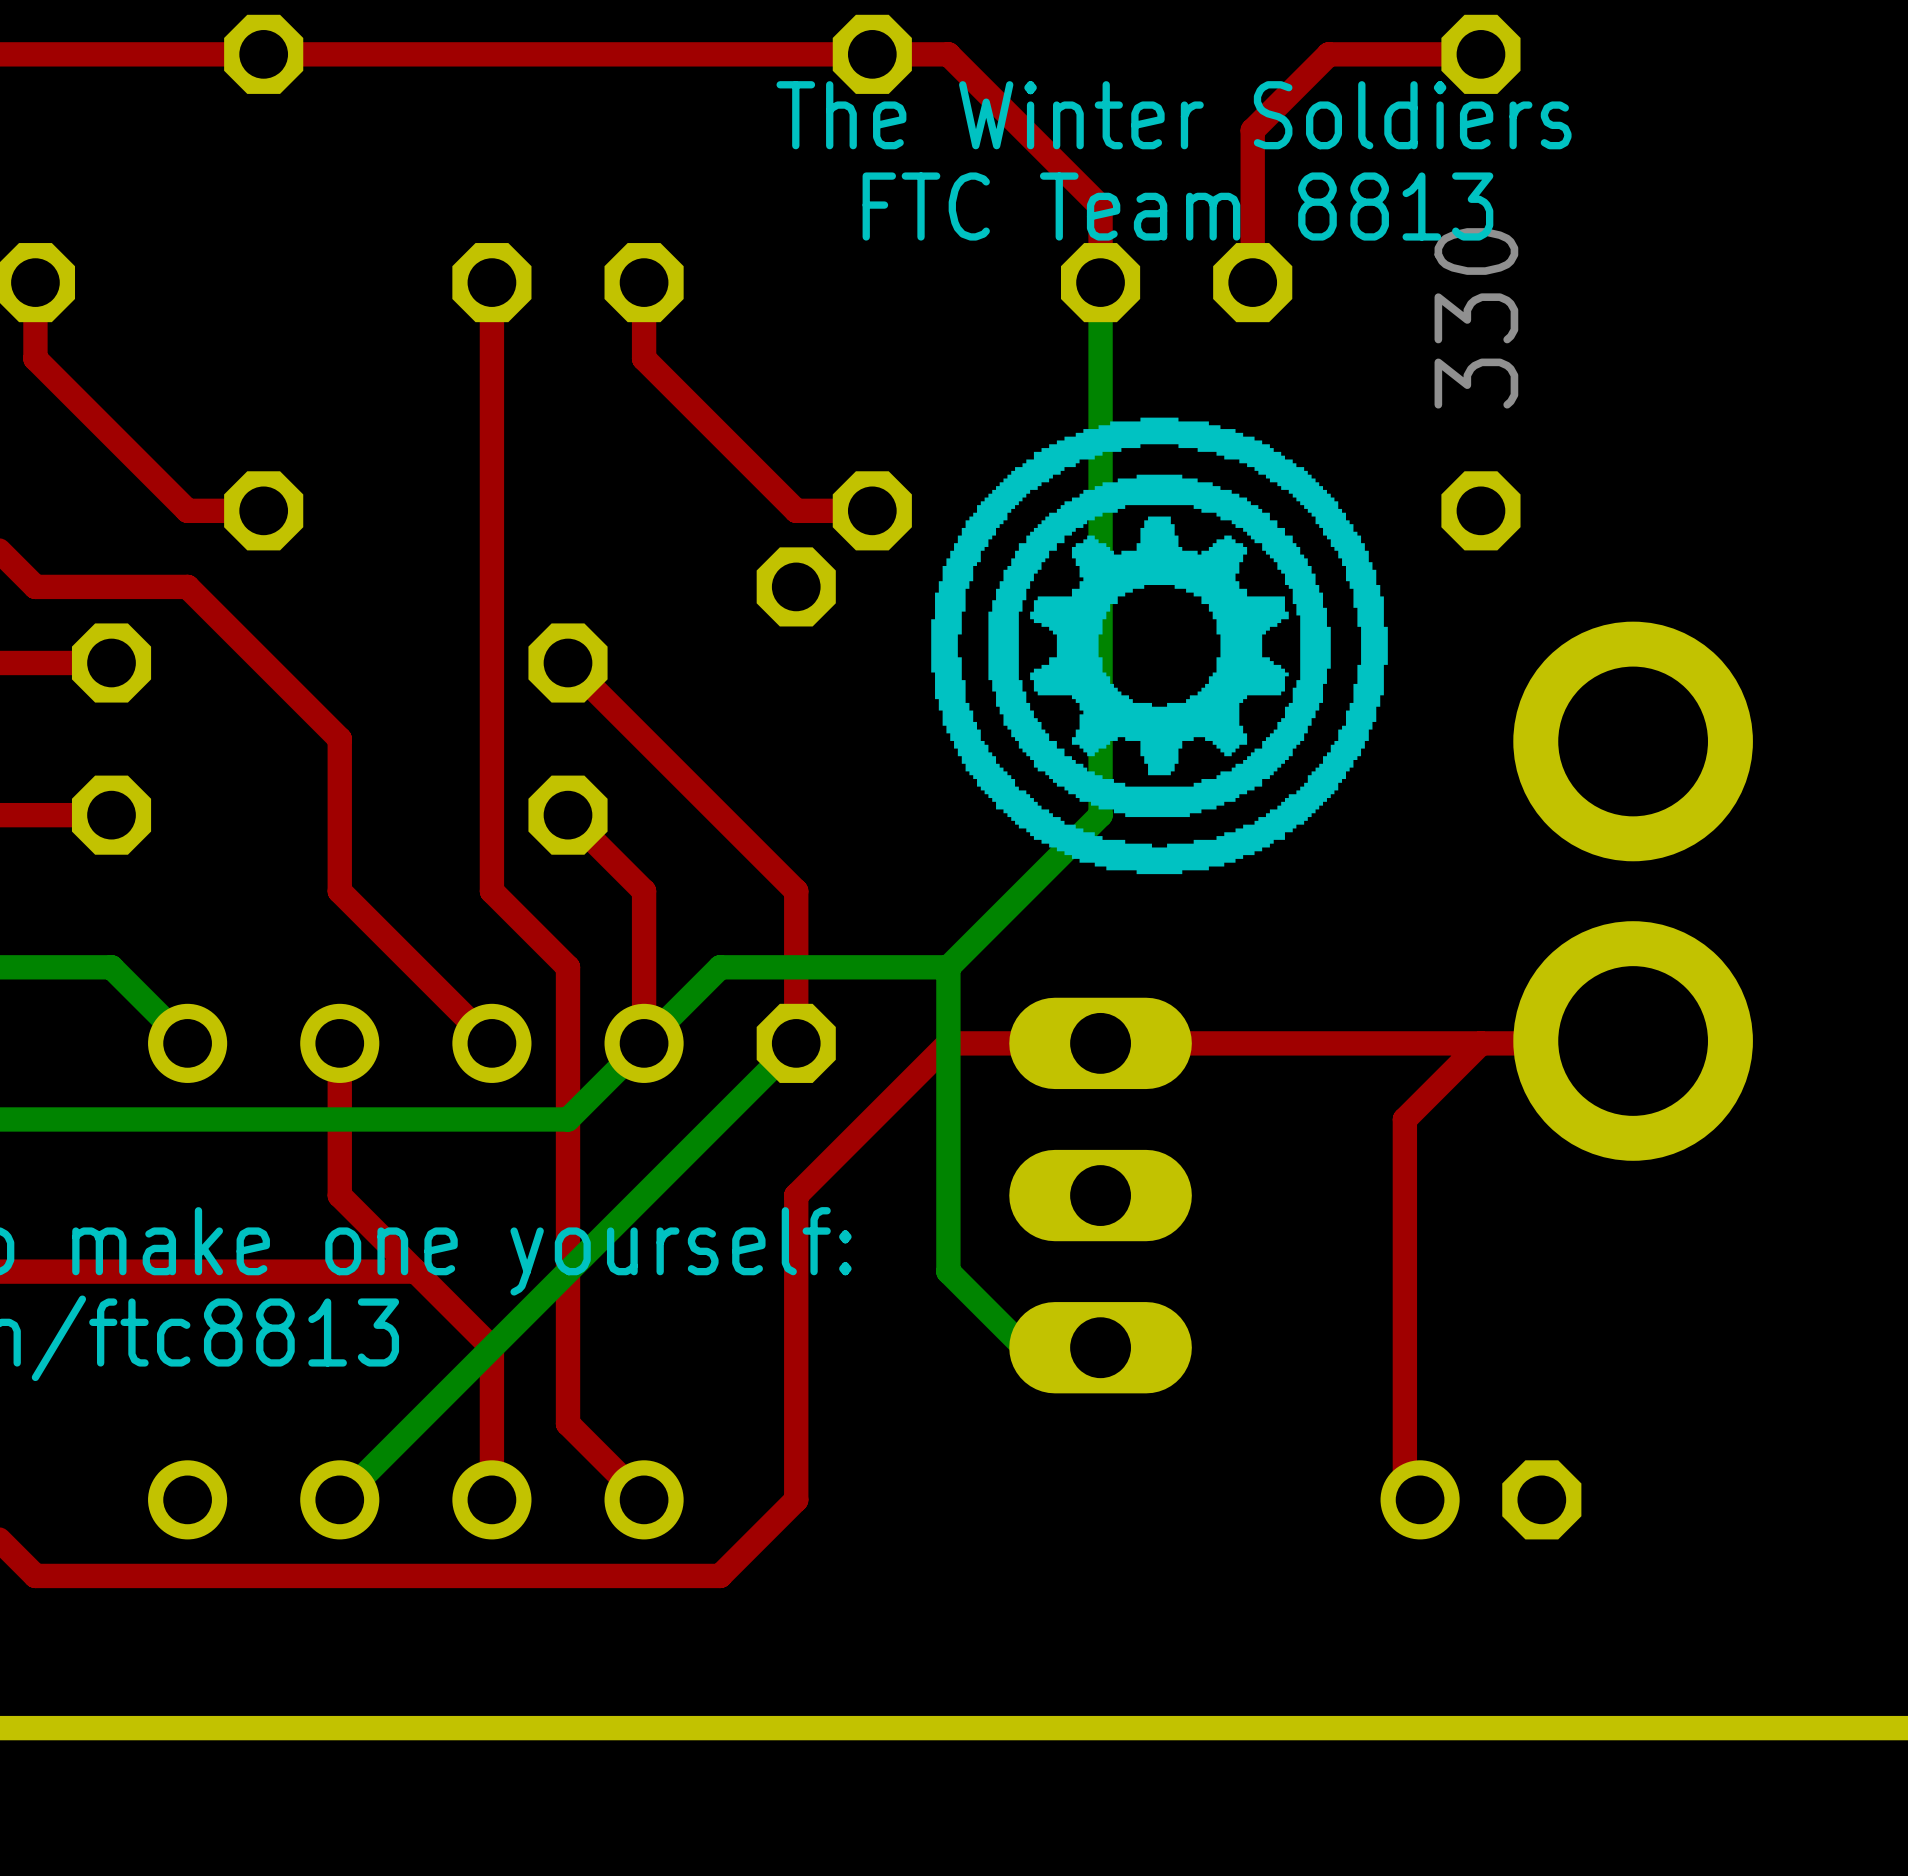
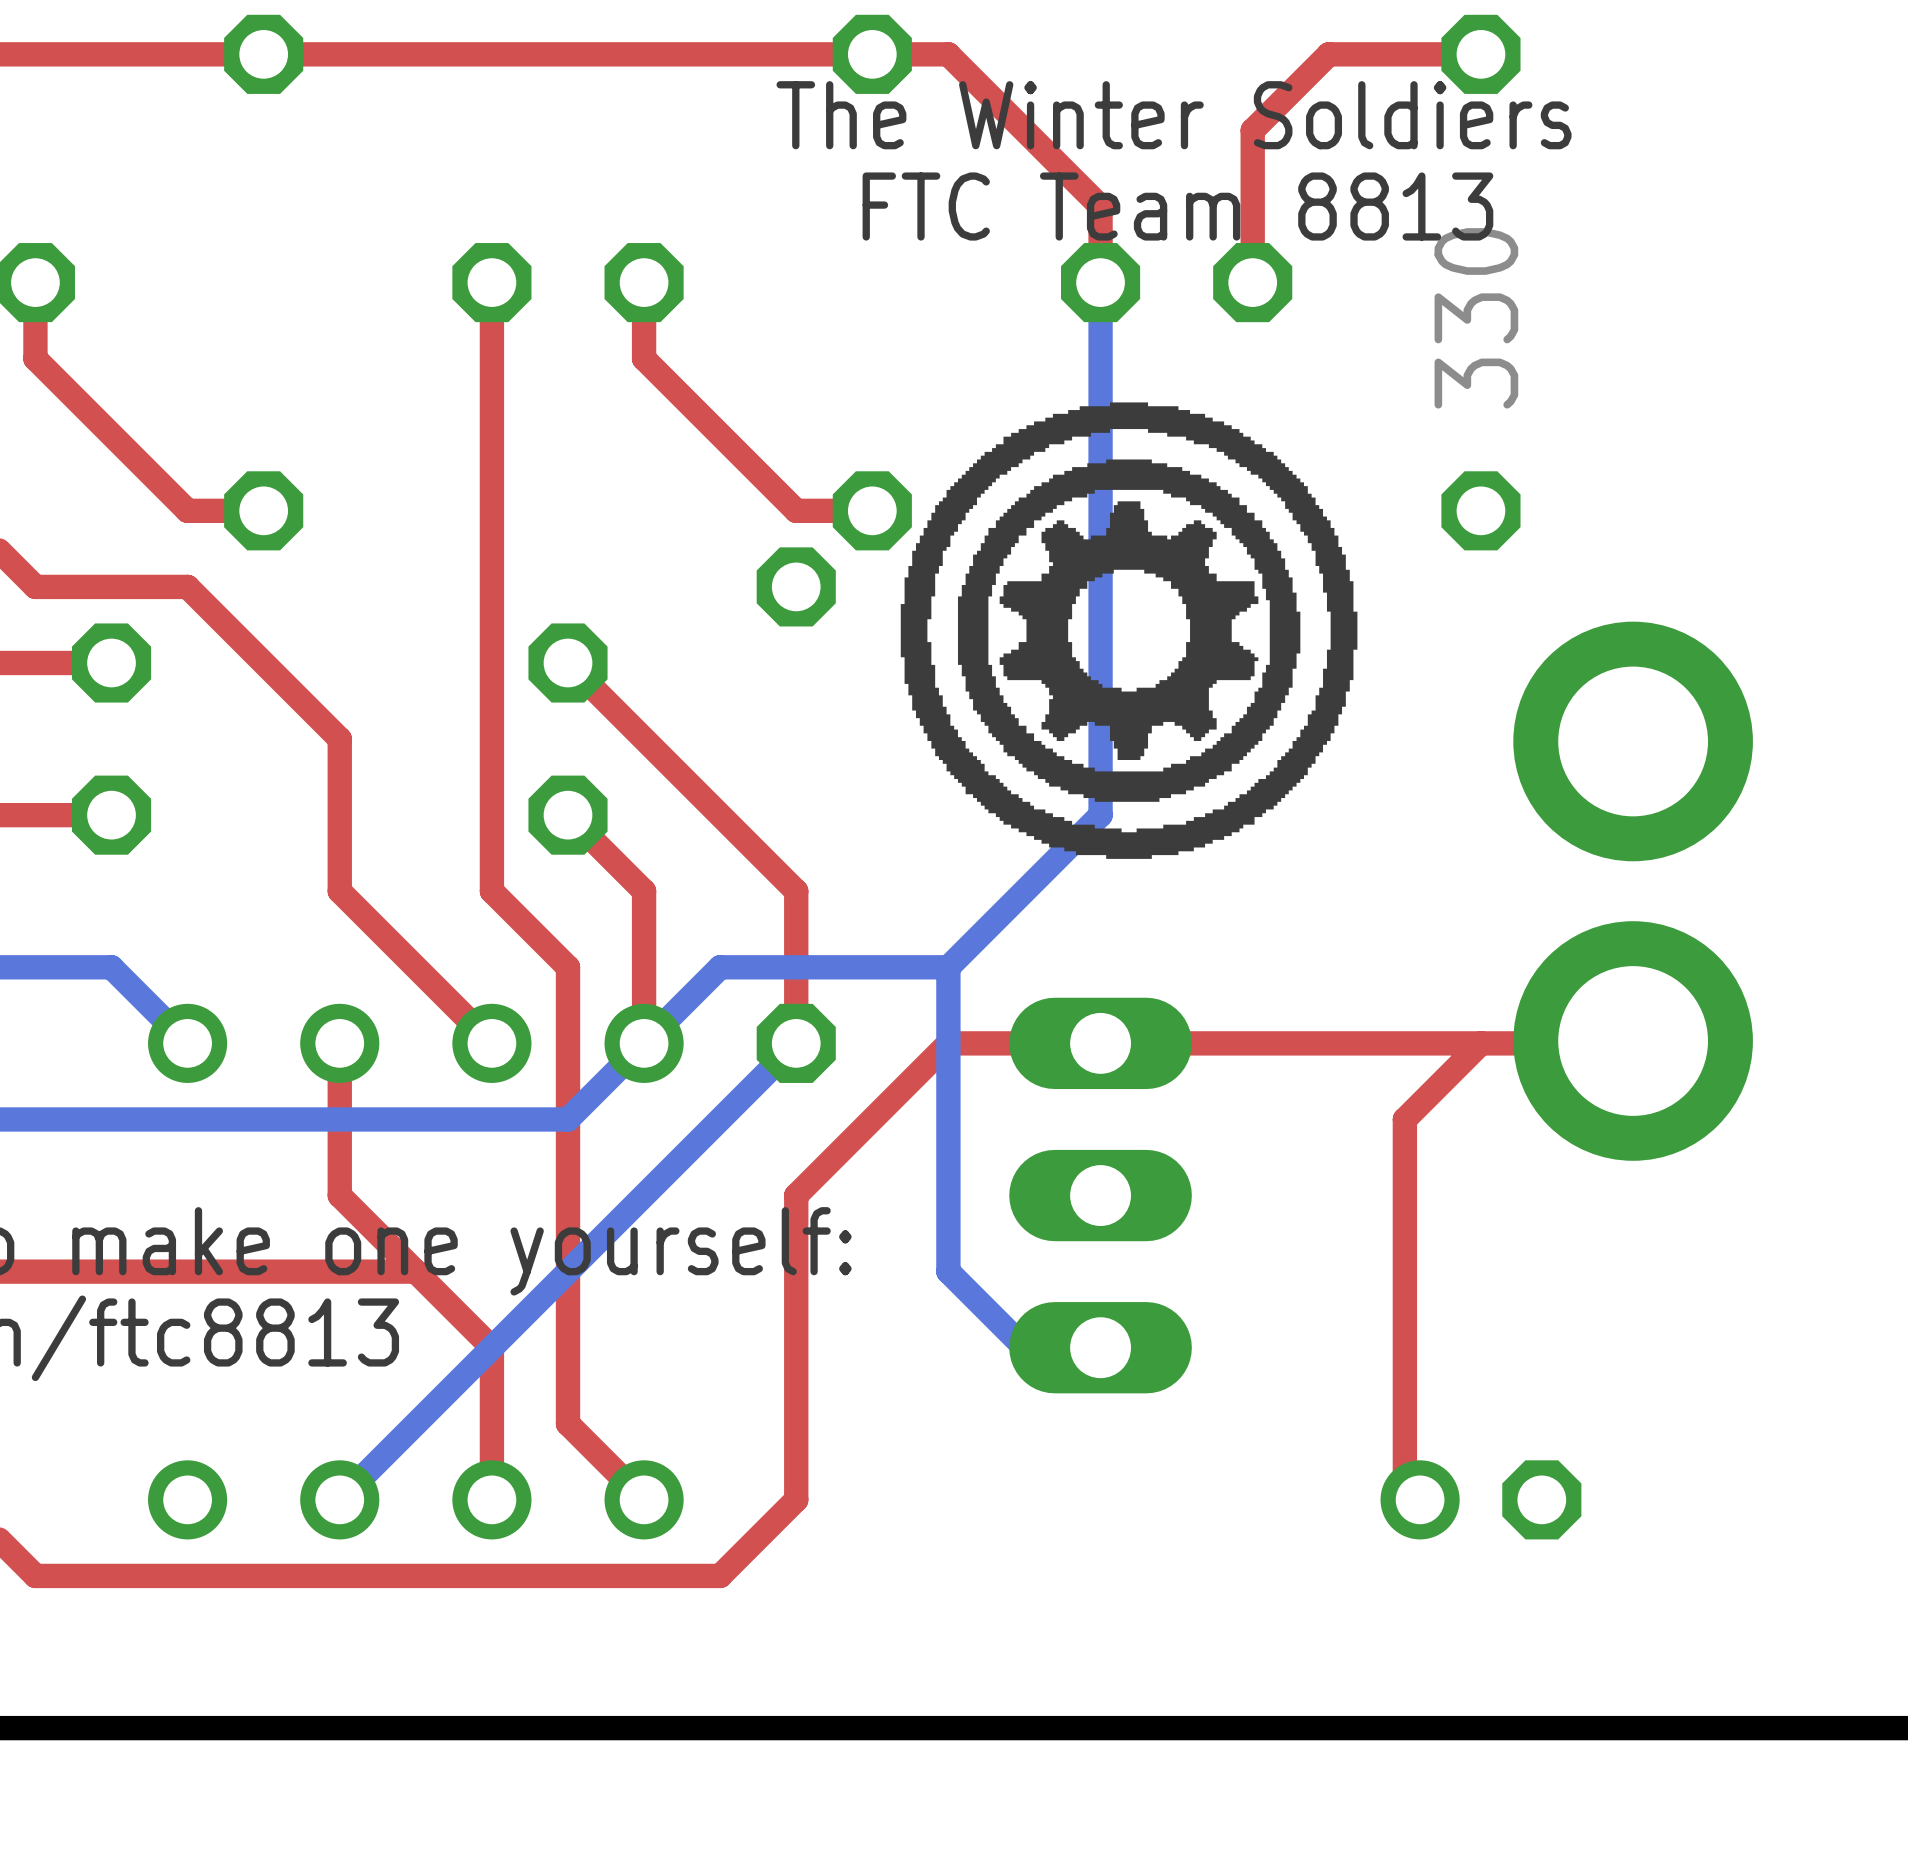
drawing position: (1159, 645) -> (1129, 630)

